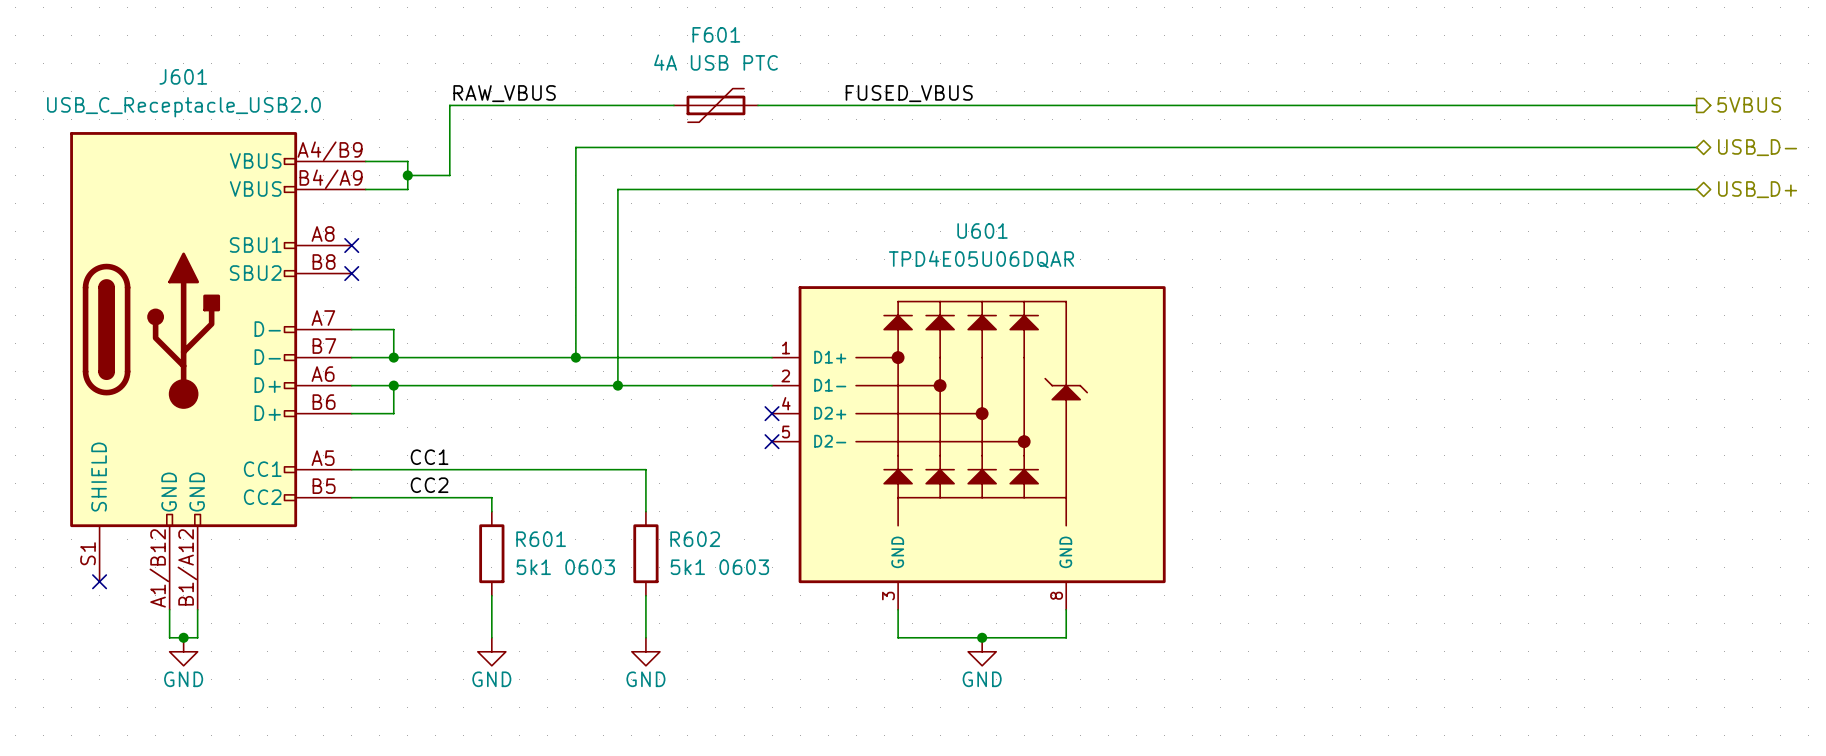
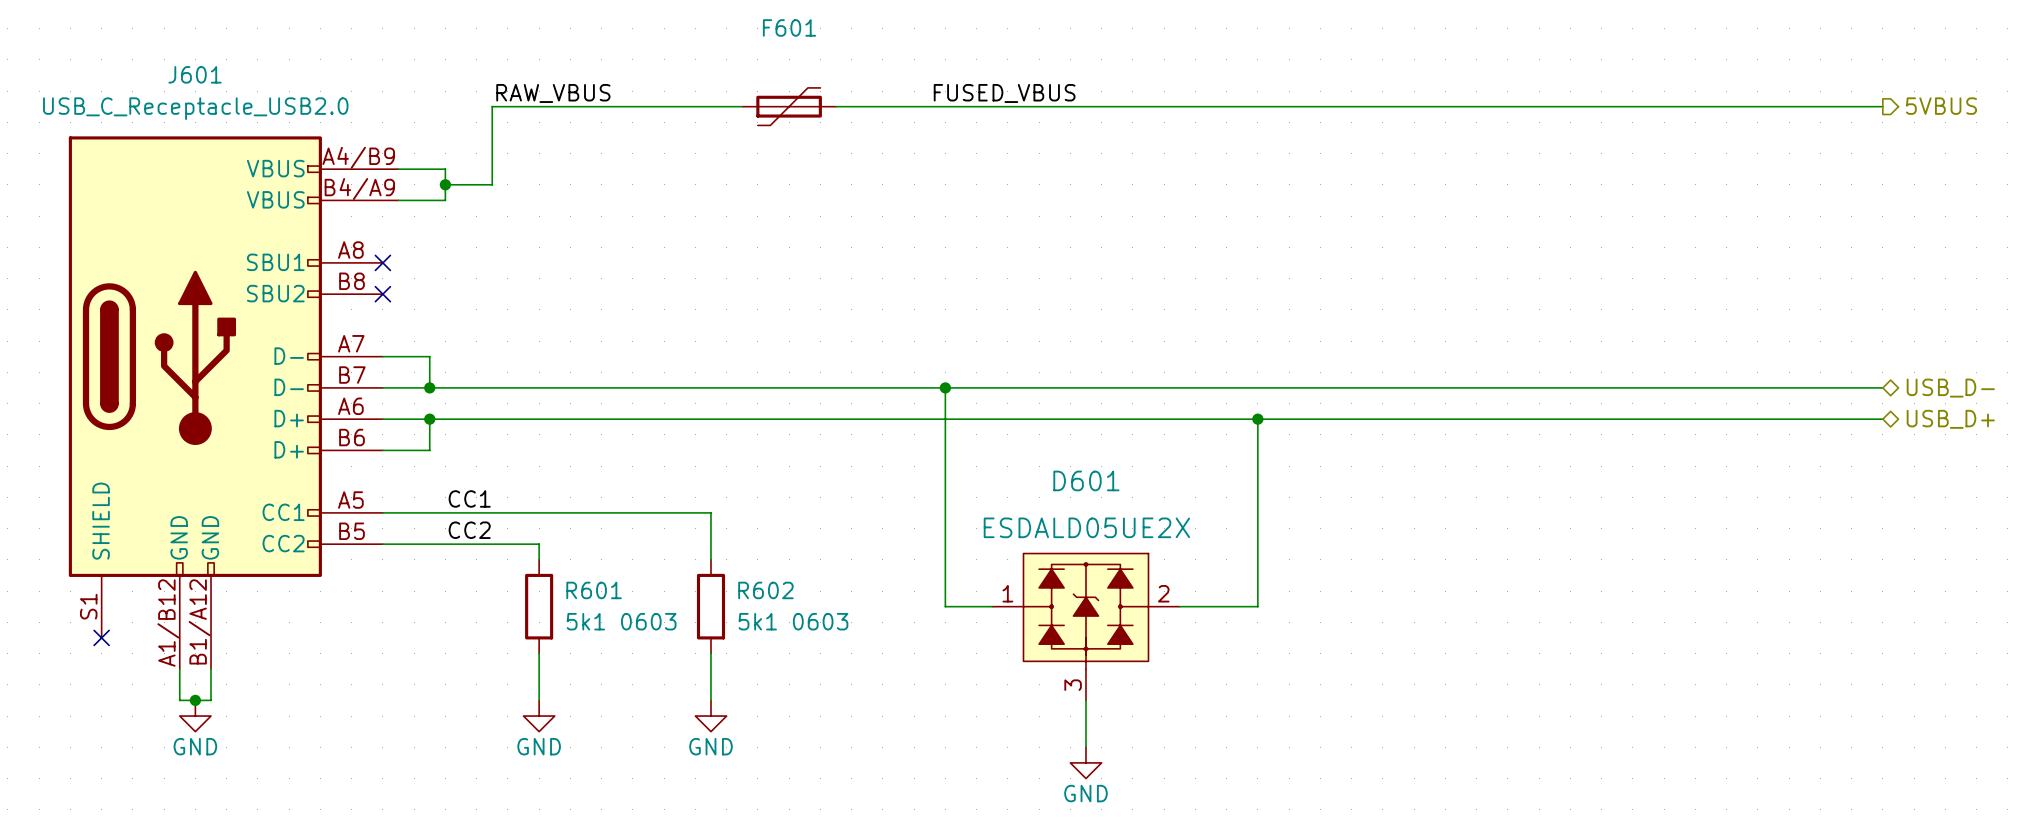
F601 value: 4A USB PTC (715, 62) -> none
wire: (1696, 147) (575, 147) (575, 357) -> none
hierarchical label position: USB_D- (1757, 147) -> USB_D- (1950, 388)
wire: (1696, 189) (617, 189) (617, 385) -> none
hierarchical label position: USB_D+ (1757, 189) -> USB_D+ (1950, 419)
junction: (575, 357) -> none
wire: none -> (851, 387) (1882, 387)
junction: none -> (945, 387)
junction: (617, 385) -> none
wire: none -> (851, 419) (1882, 419)
junction: none -> (1257, 419)
no-connect mark: (772, 413) -> none
no-connect mark: (772, 441) -> none
U601: TPD4E05U06DQAR (968, 447) -> none
D601: none -> ESDALD05UE2X (1085, 626)
wire: (898, 609) (898, 637) (1066, 637) (1066, 609) -> none
wire: none -> (1085, 700) (1085, 747)
junction: (982, 637) -> none
power symbol position: GND (982, 651) -> GND (1085, 762)

